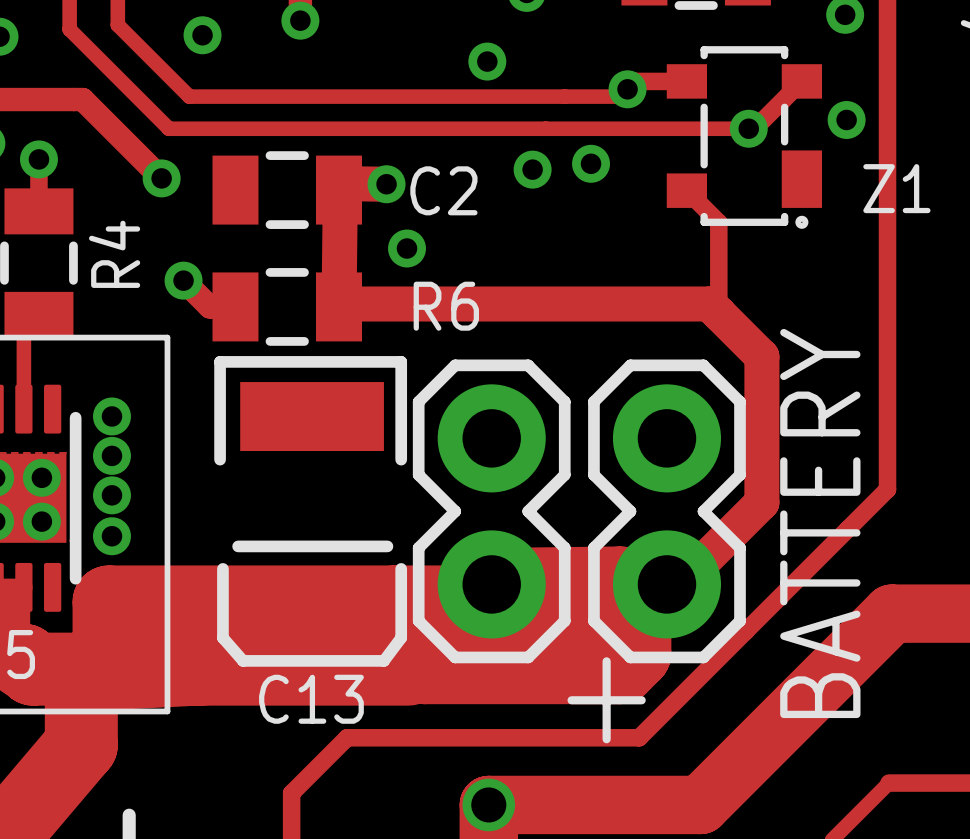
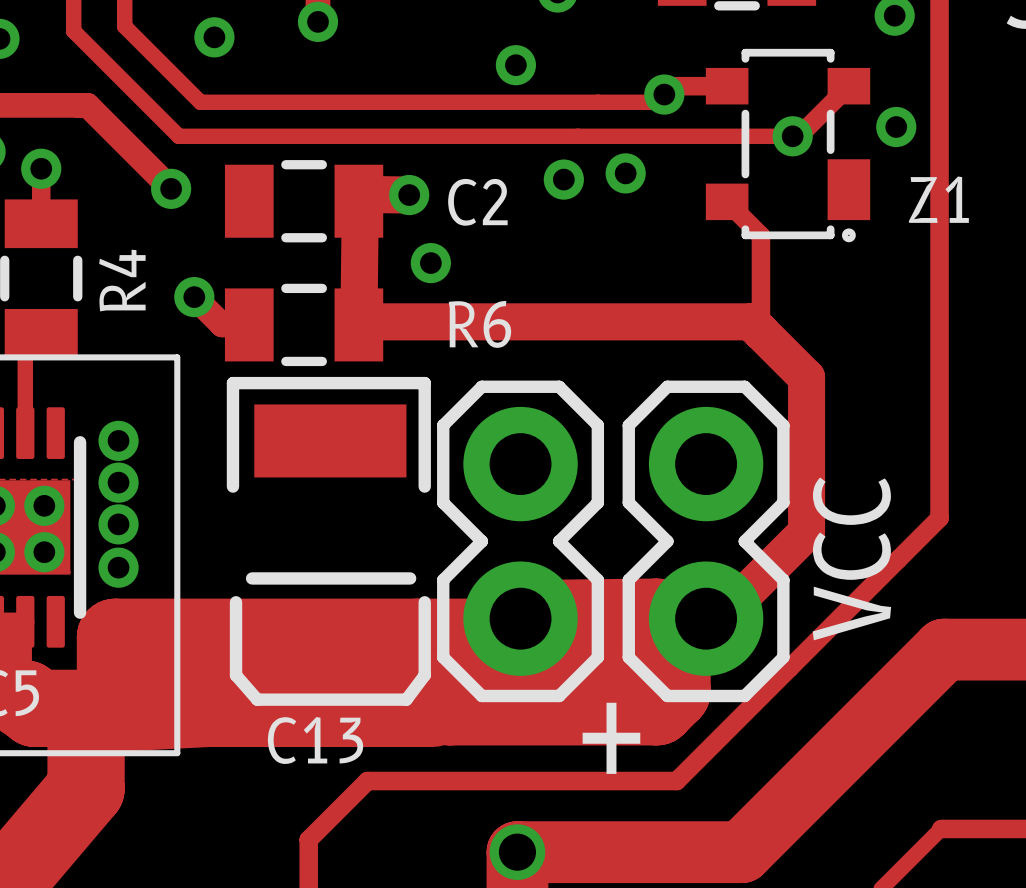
BATTERY name: BATTERY (820, 523) -> VCC (851, 558)

